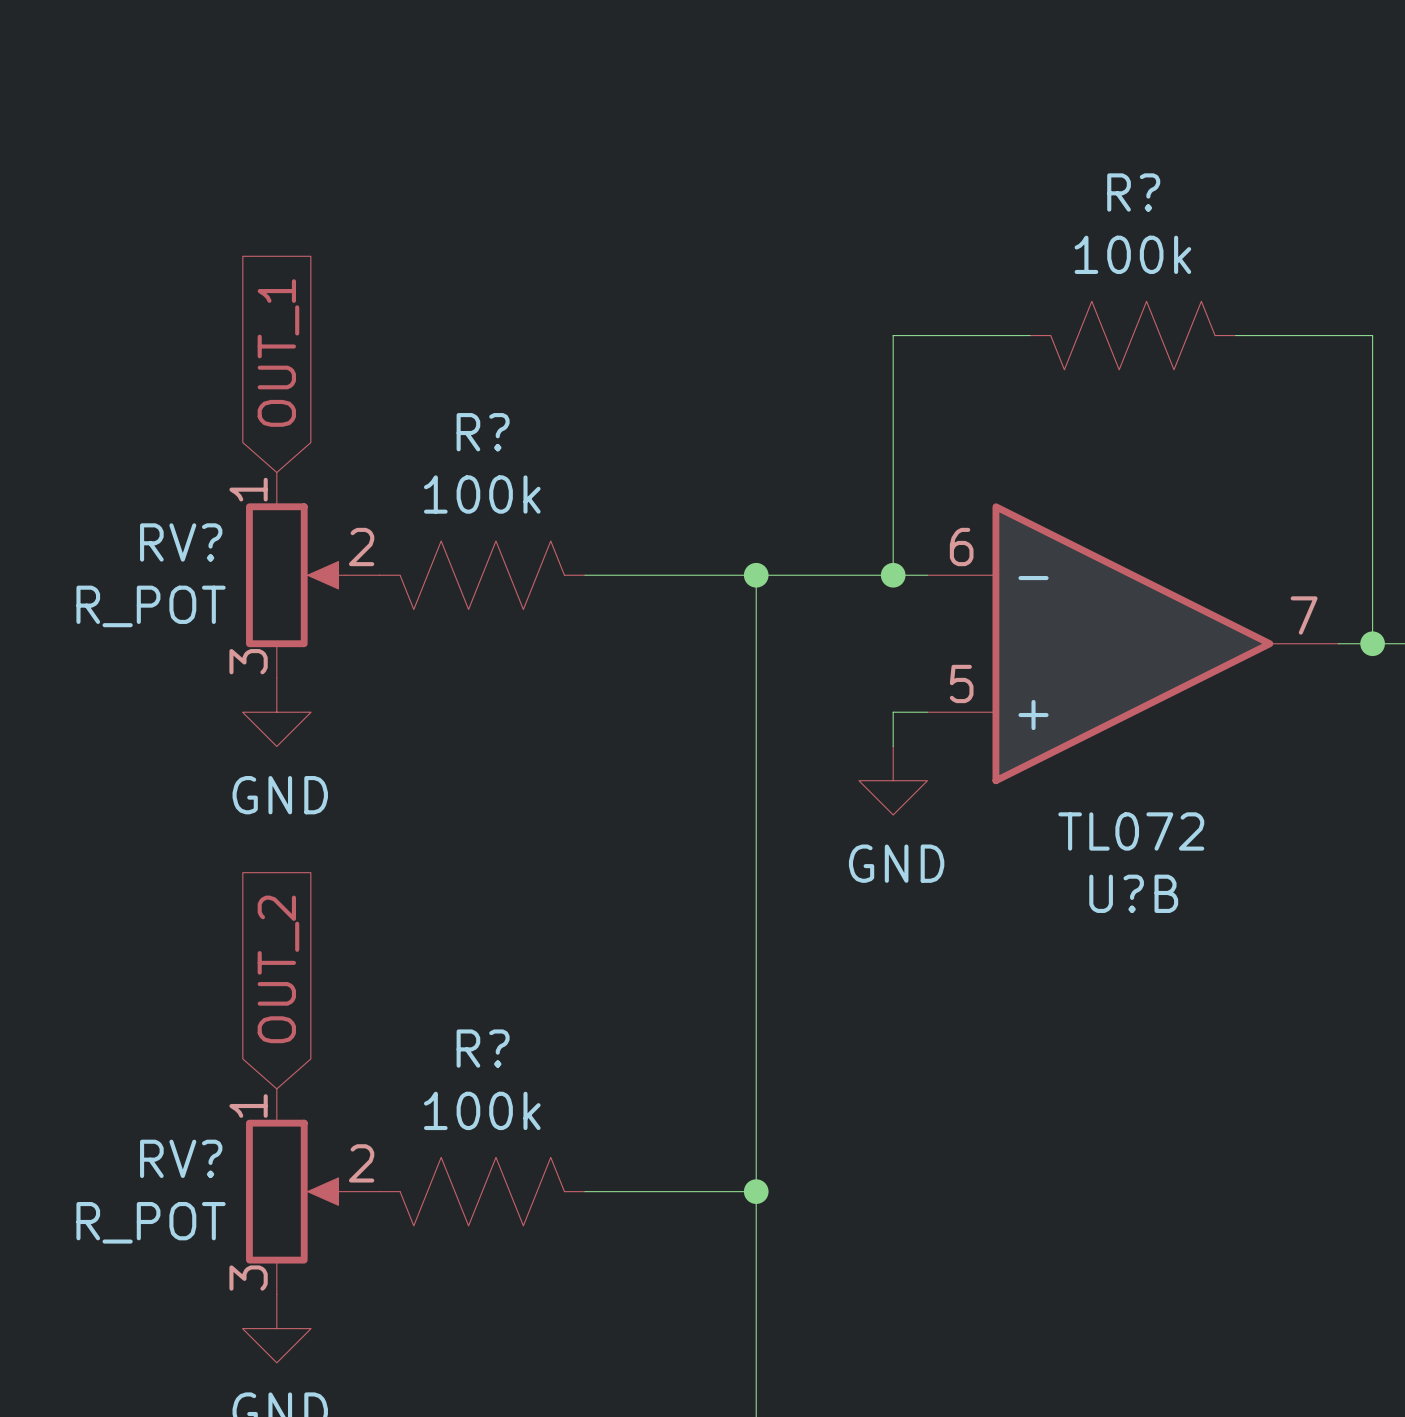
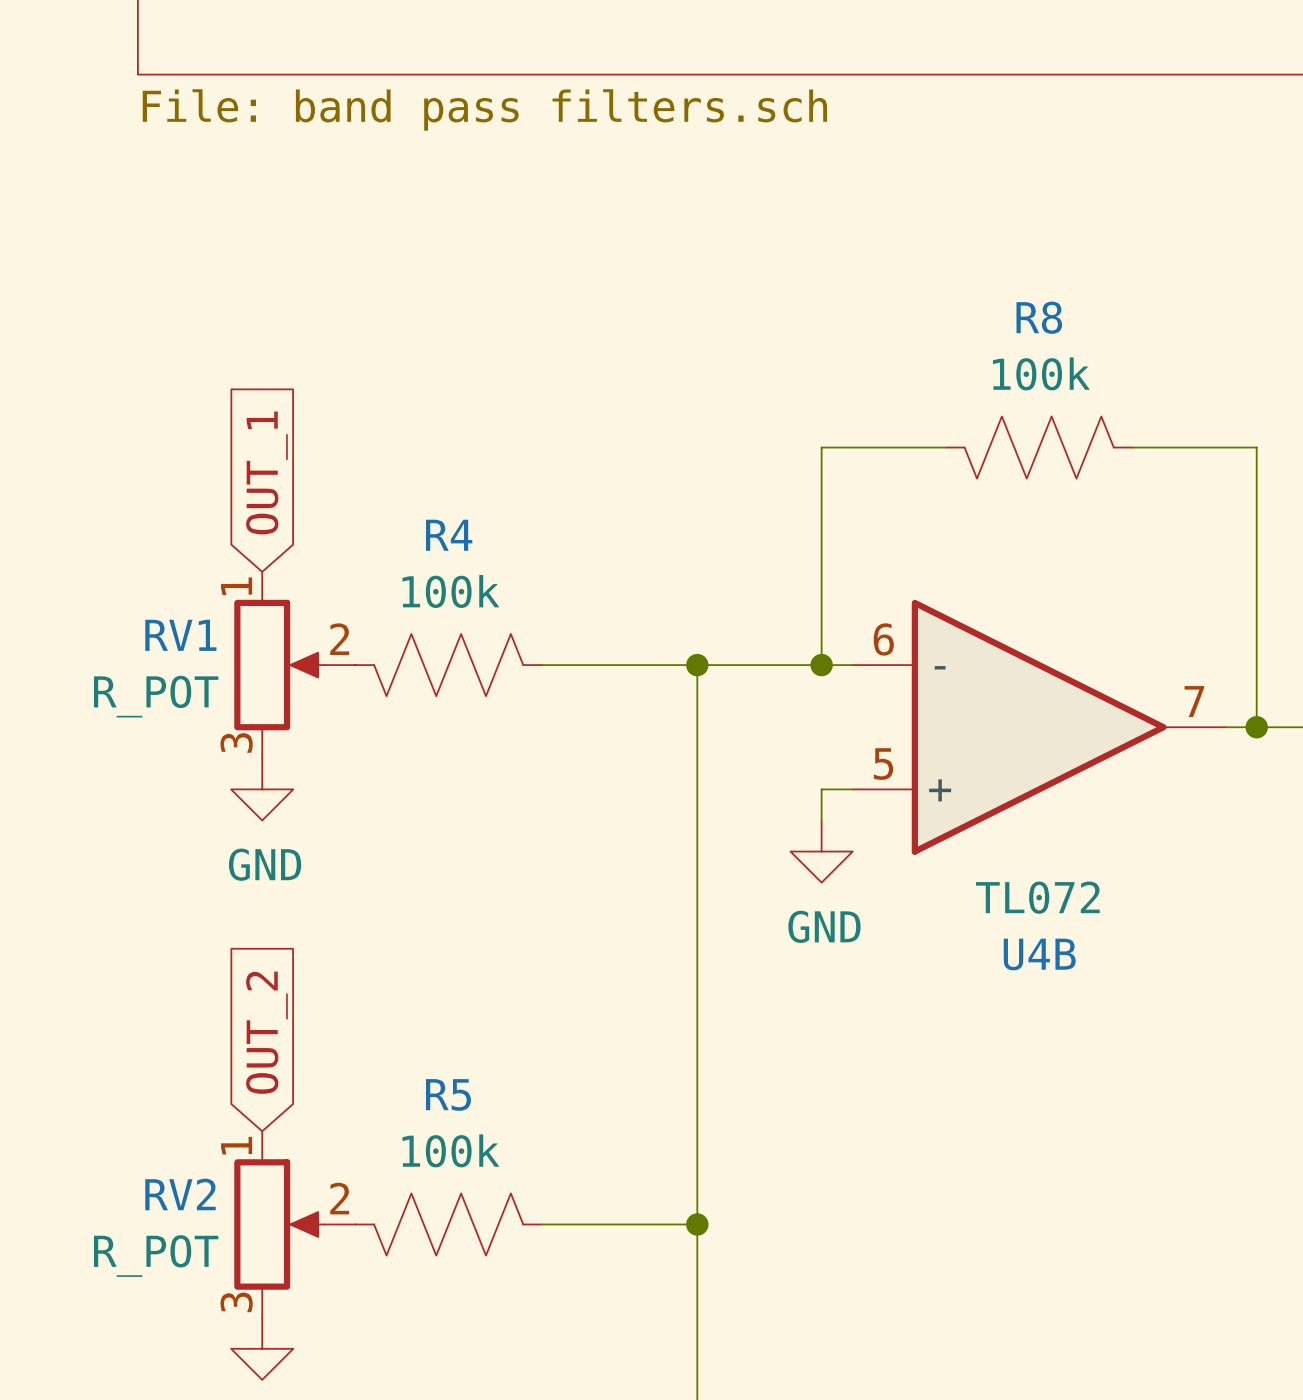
R? name: R? (1133, 192) -> R8 (1039, 317)
R? name: R? (483, 432) -> R4 (449, 535)
RV? name: RV? (181, 542) -> RV1 (180, 635)
U?B name: U?B (1133, 893) -> U4B (1039, 954)
R? name: R? (483, 1048) -> R5 (448, 1094)
RV? name: RV? (181, 1158) -> RV2 (180, 1194)

